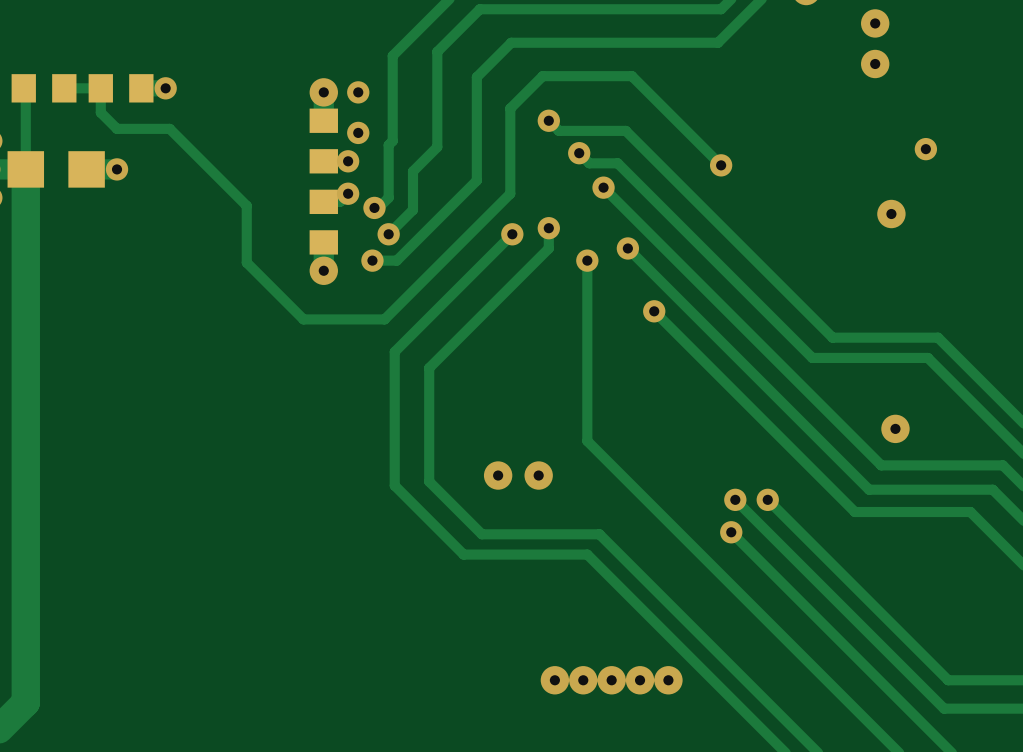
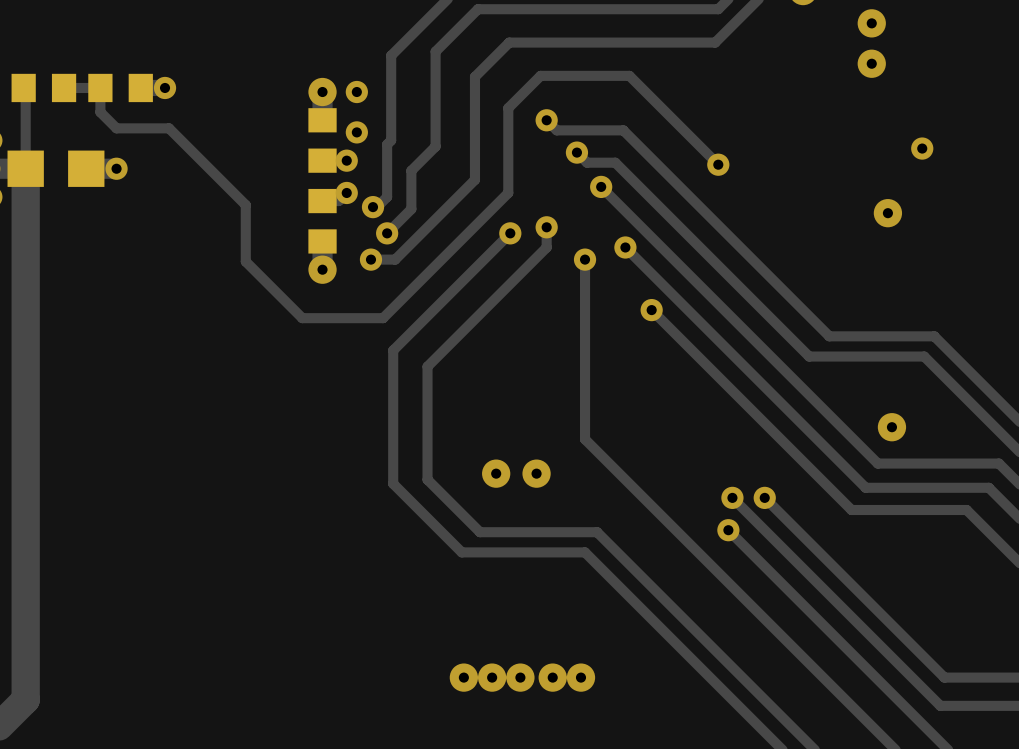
via: none -> (463, 677)
via: none -> (492, 677)
via: none -> (520, 677)
via: (611, 680) -> none
via: (640, 680) -> none
via: (668, 680) -> none

